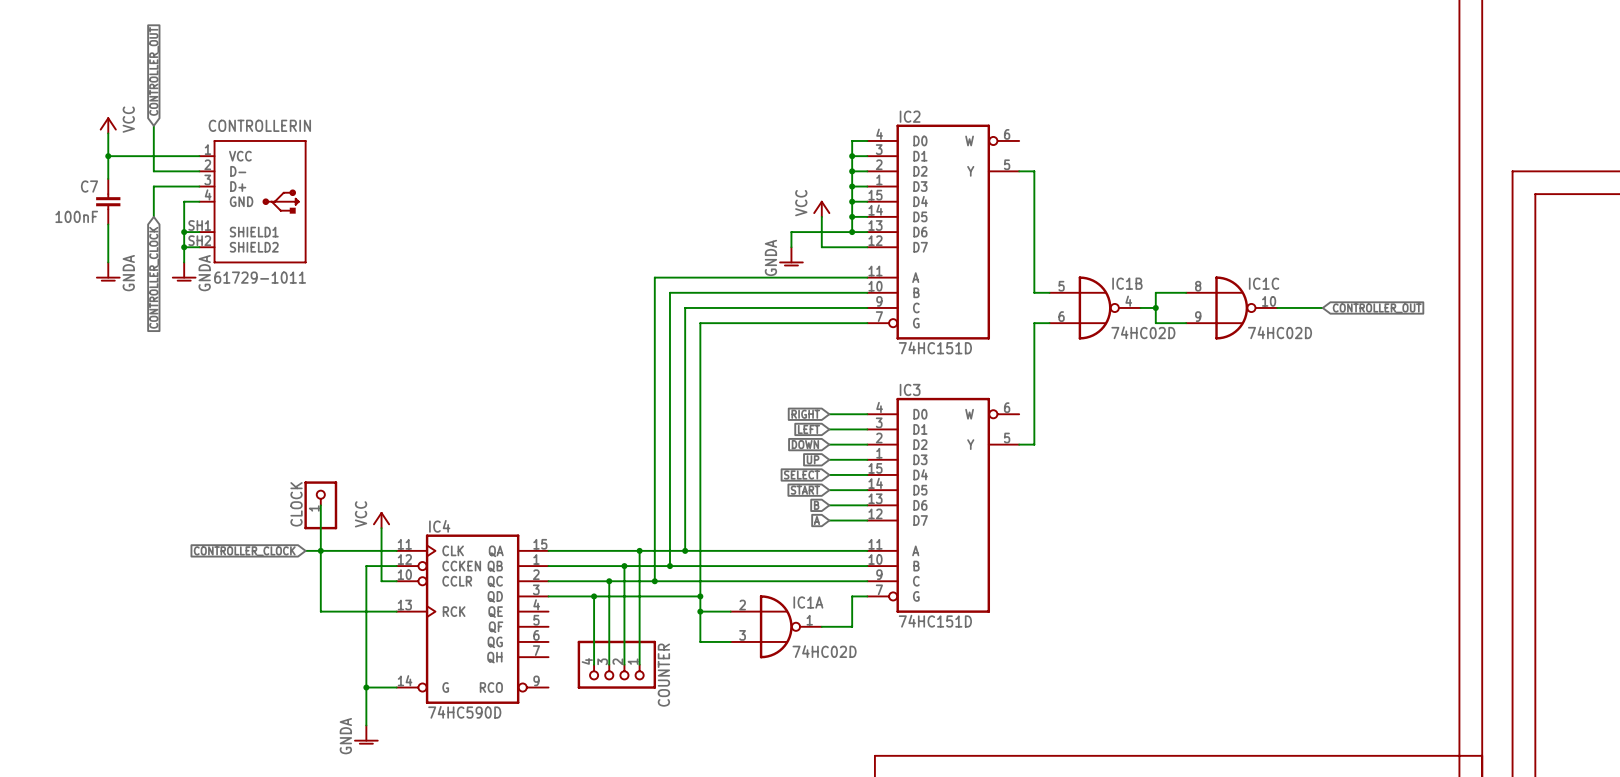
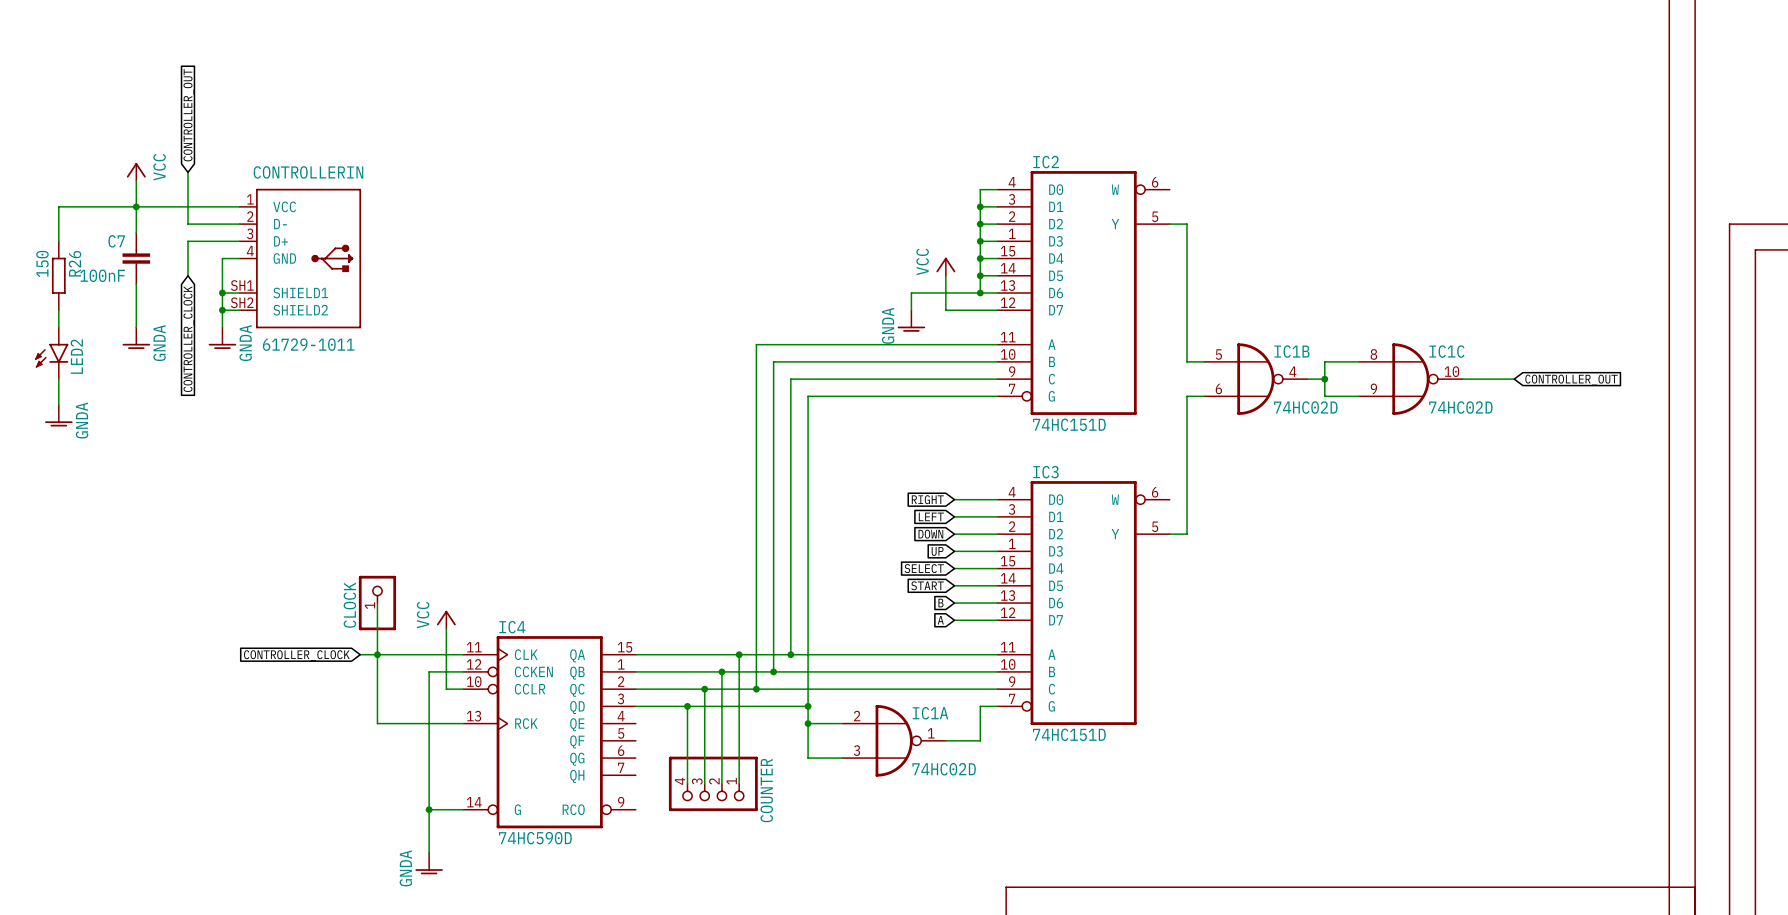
wire: none -> (136, 206) (58, 206) (58, 241)
R26: none -> 150 (58, 275)
wire: none -> (58, 310) (58, 327)
LED2: none -> (51, 353)
wire: none -> (58, 379) (58, 404)
power symbol: none -> GNDA (58, 415)

